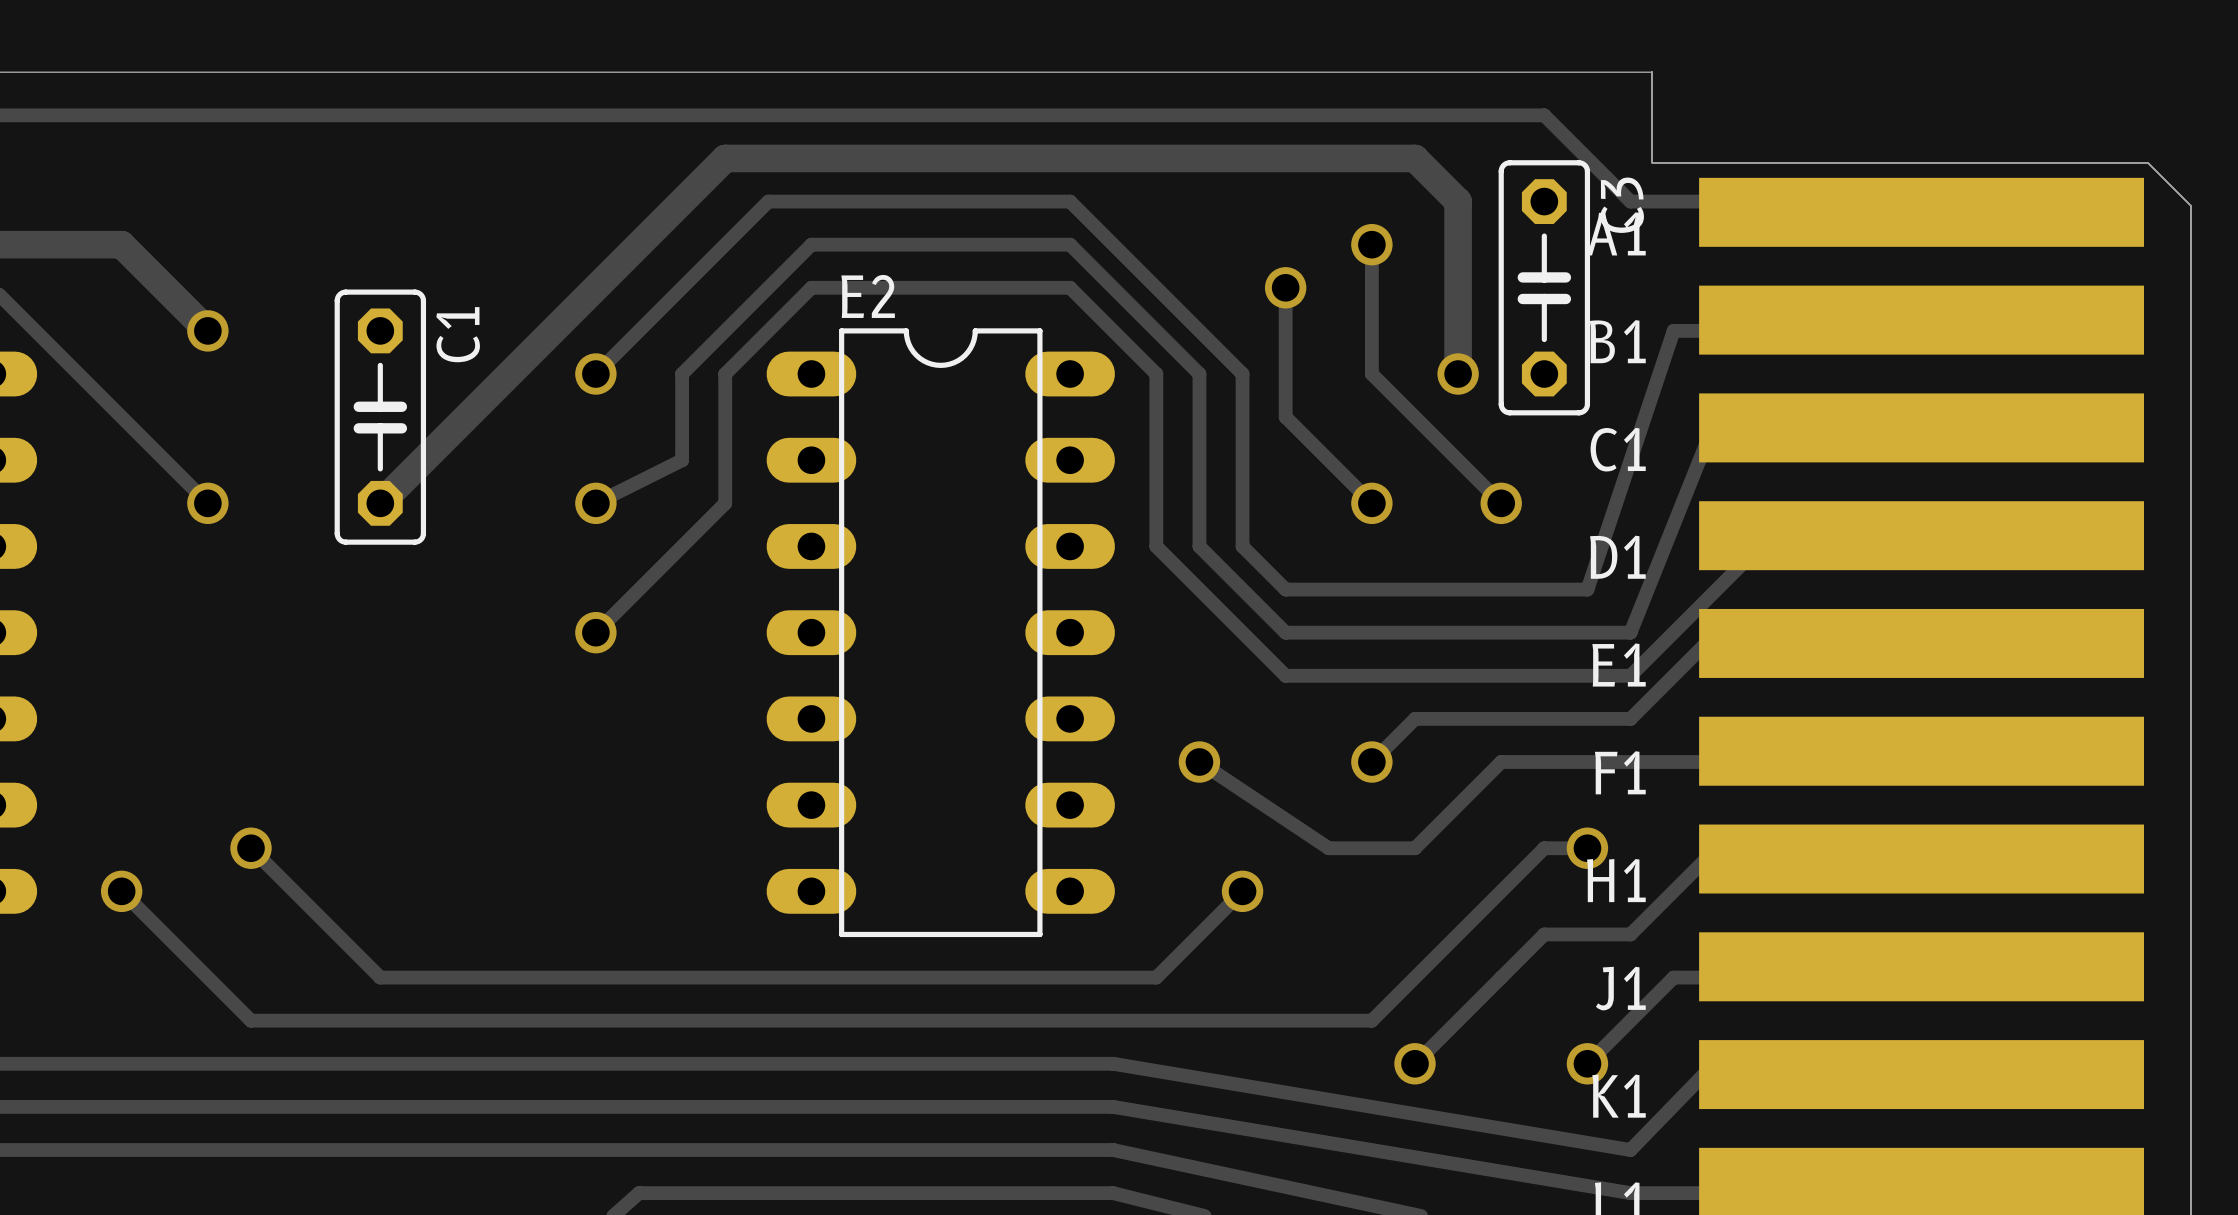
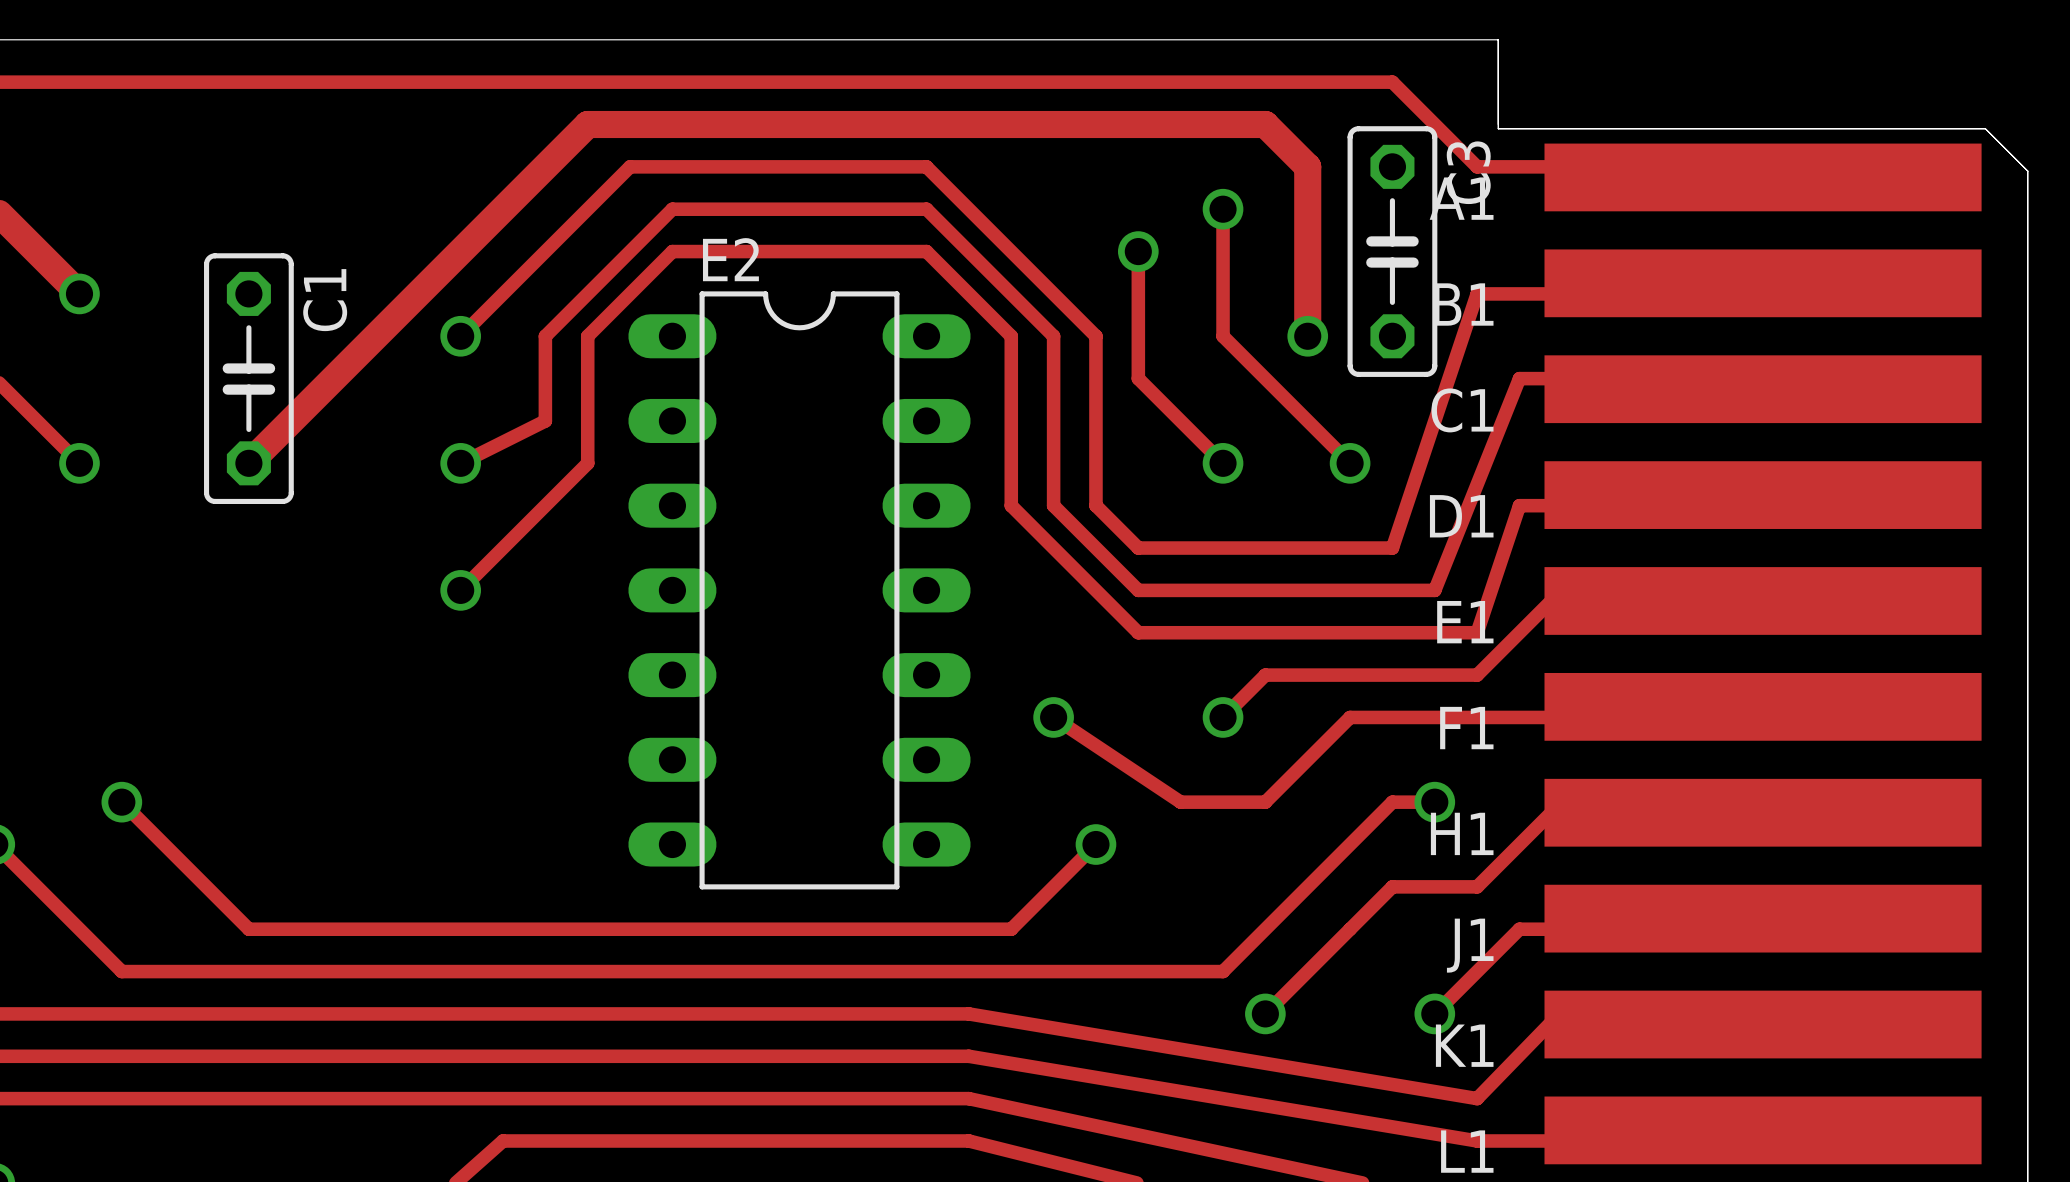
track: (1673, 330) (1587, 589) (1544, 589) -> (1519, 293) (1477, 293) (1392, 548)
track: (1716, 417) (1630, 632) (1587, 632) -> (1561, 378) (1519, 378) (1434, 590)
track: (1759, 546) (1630, 675) -> (1604, 505) (1519, 505) (1477, 632)

